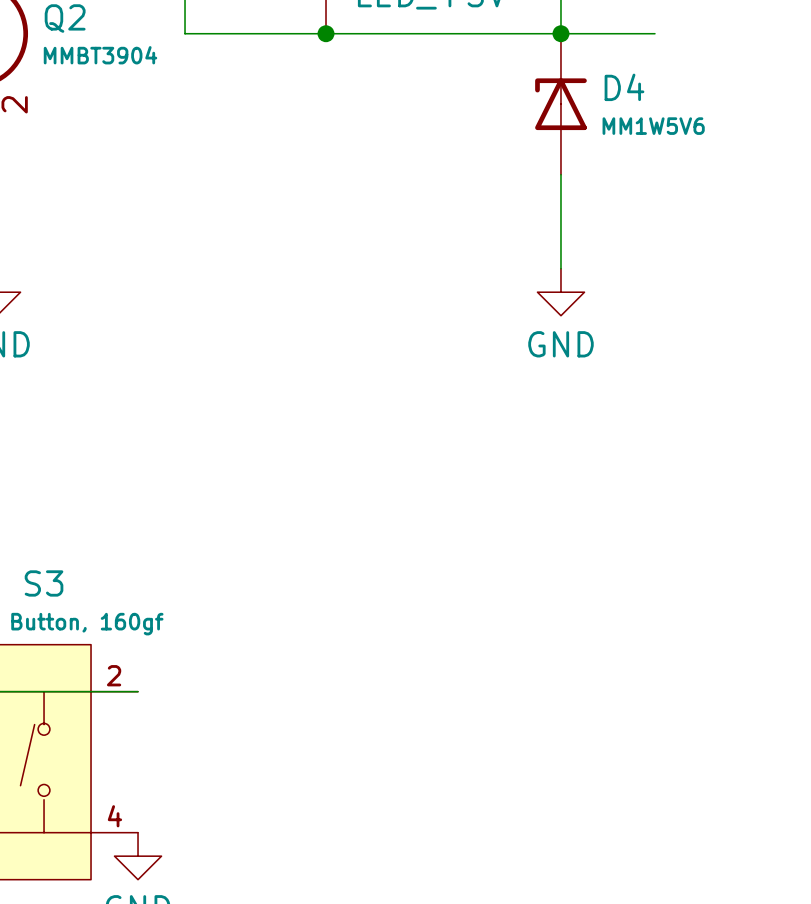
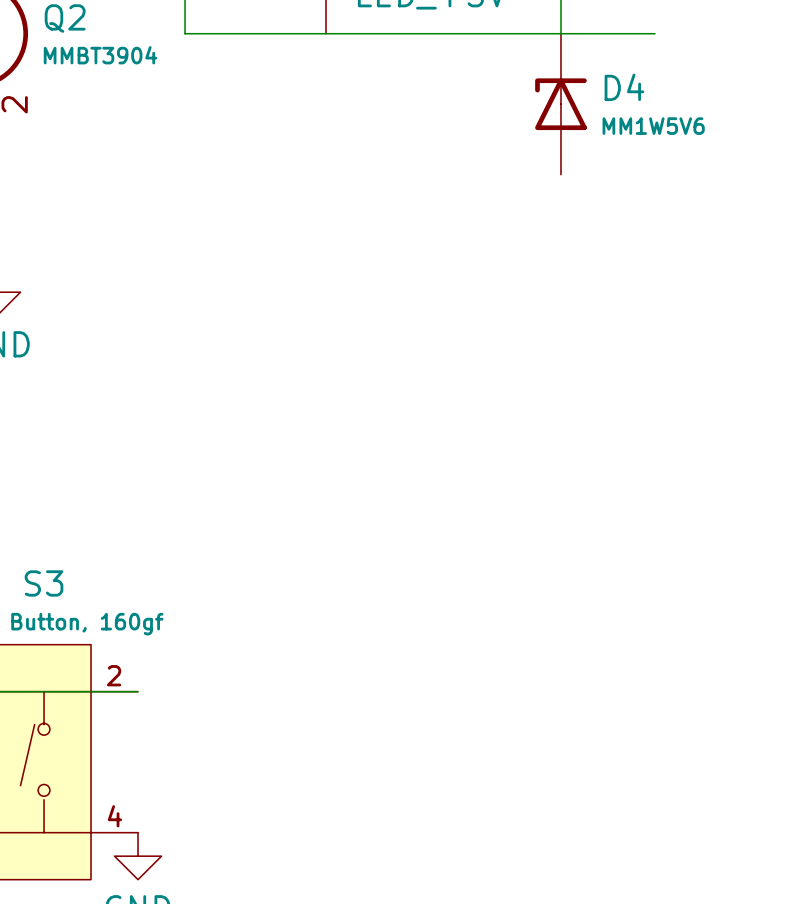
junction: (326, 33) -> none
junction: (560, 33) -> none
wire: (560, 174) (560, 268) -> none
power symbol: GND (560, 292) -> none

